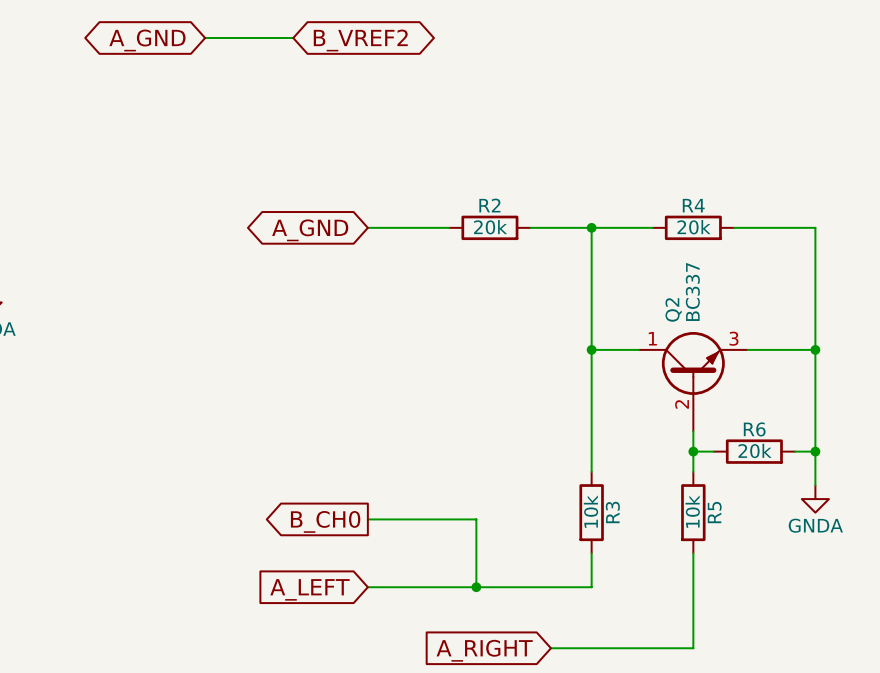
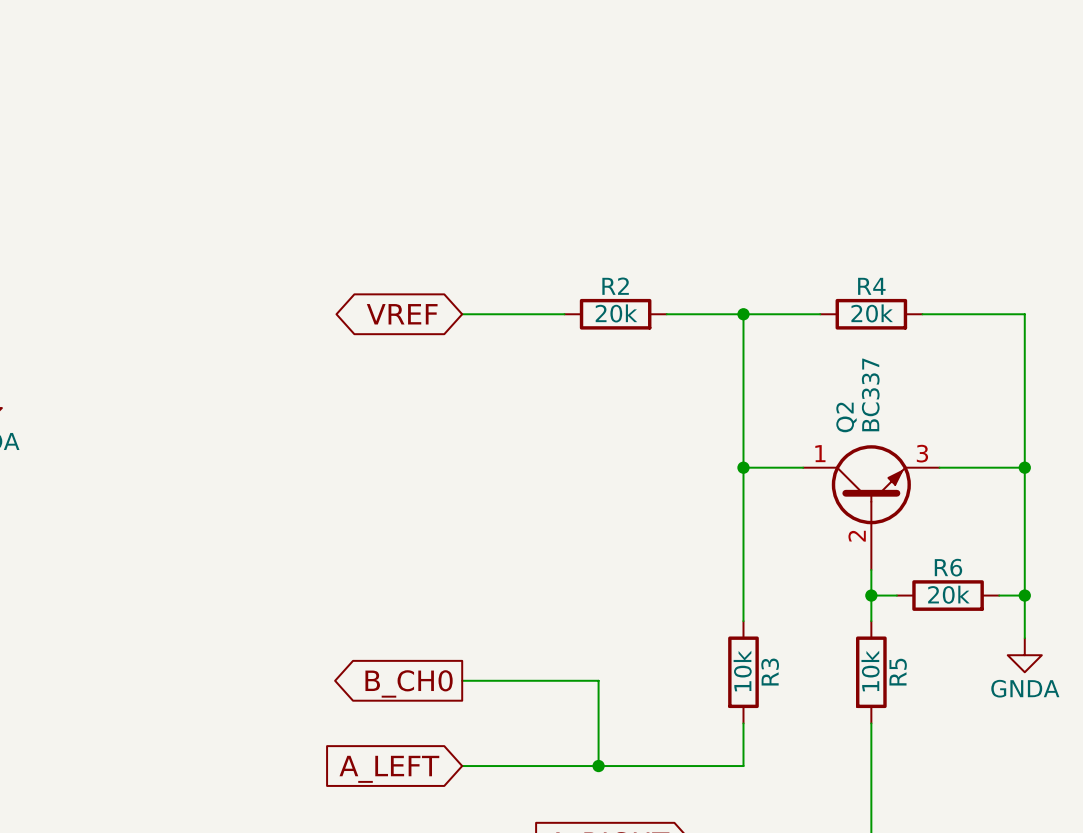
wire: (205, 38) (293, 38) -> none
global label: A_GND (147, 40) -> none
global label: B_VREF2 (360, 40) -> none
global label: A_GND (310, 230) -> VREF (402, 314)

